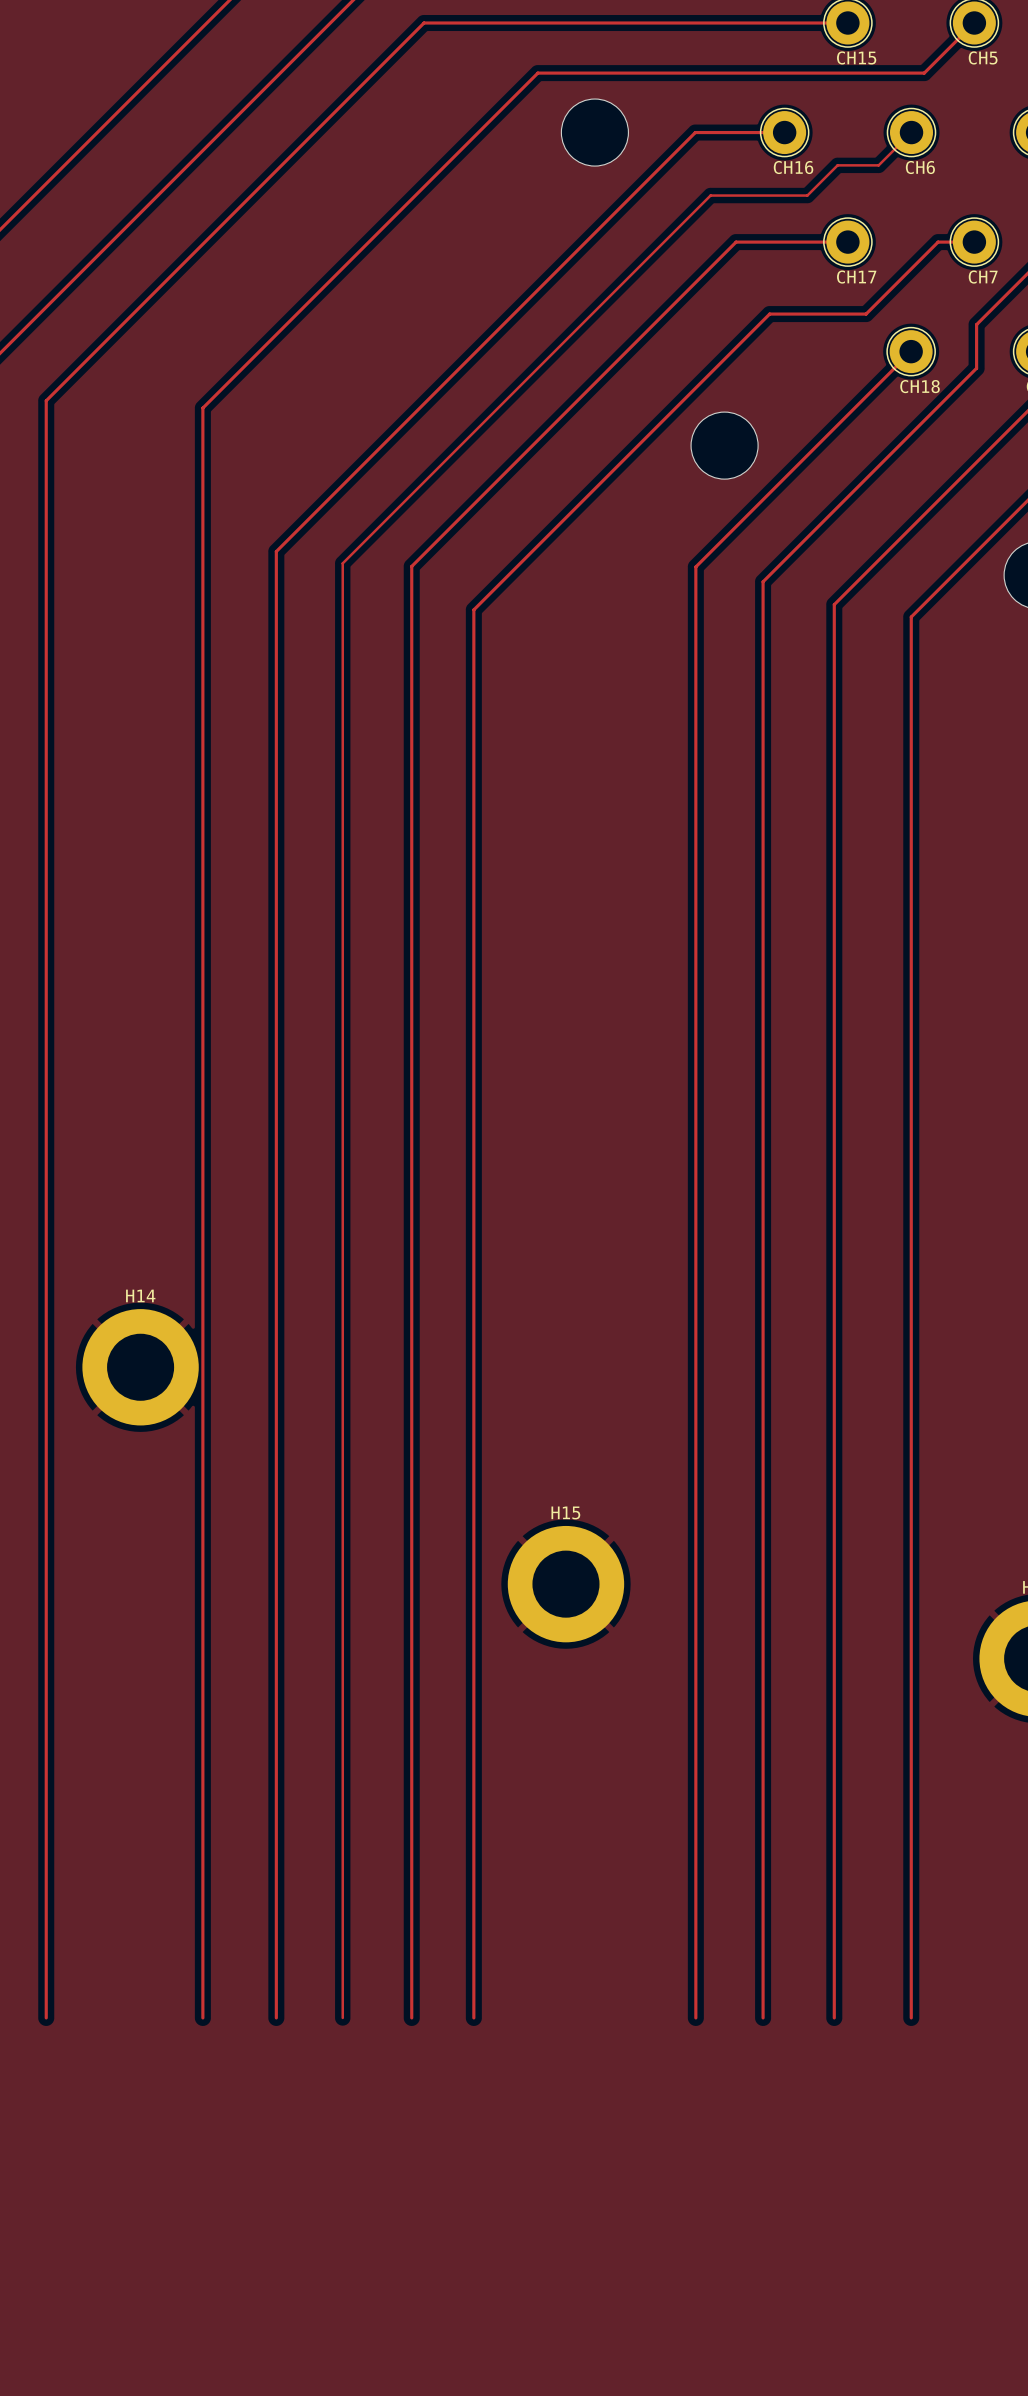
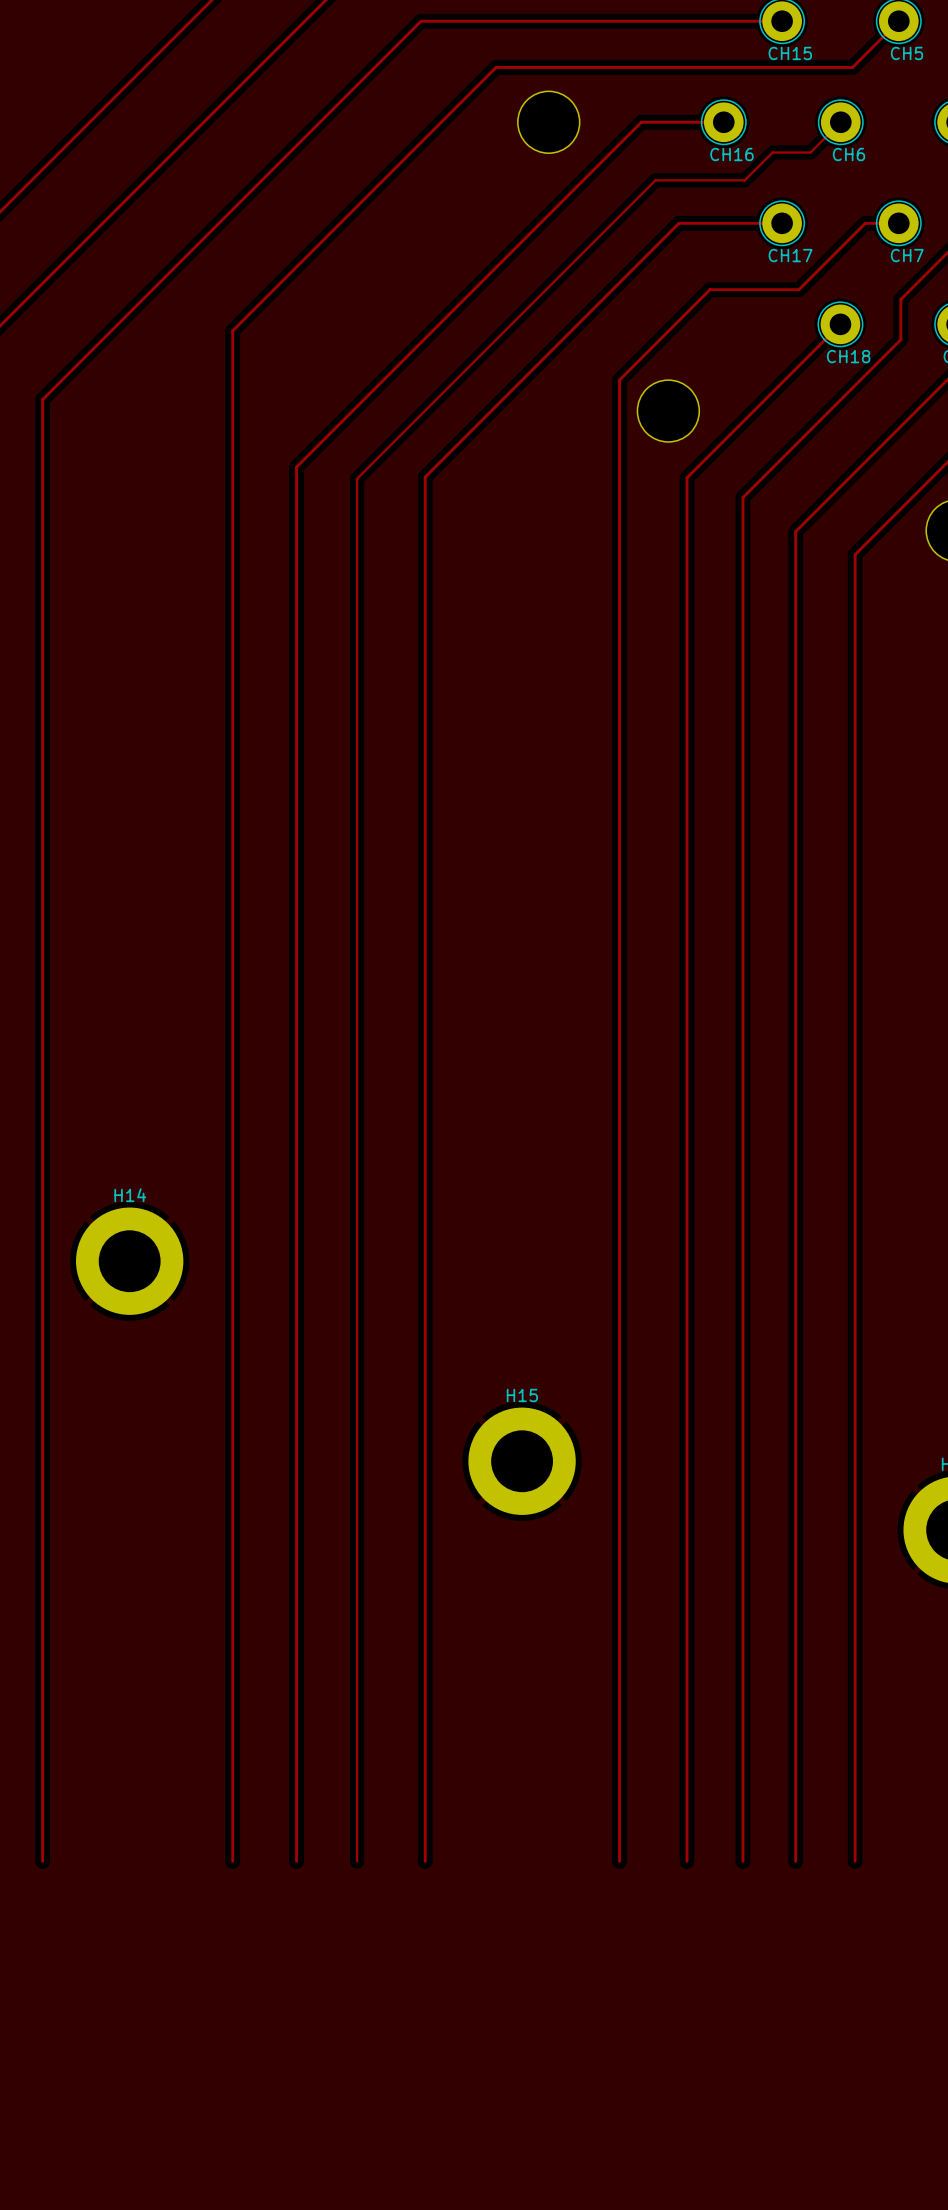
track: (456, 23) (424, 23) (46, 400) (46, 433) -> (421, 21) (42, 399)
track: (252, 358) (202, 408) (202, 2017) -> (232, 330) (232, 1861)
track: (671, 412) (473, 609) (473, 2017) -> (619, 380) (619, 1861)
track: (321, 506) (276, 551) (276, 2017) -> (296, 467) (296, 1861)
track: (461, 517) (411, 566) (411, 2017) -> (425, 477) (425, 1861)
track: (744, 517) (695, 566) (695, 2017) -> (687, 477) (687, 1861)
track: (387, 518) (342, 563) (342, 2017) -> (357, 478) (357, 1861)
track: (805, 539) (763, 581) (763, 2017) -> (742, 497) (742, 1861)
track: (862, 576) (834, 604) (834, 2017) -> (795, 531) (795, 1861)
track: (927, 601) (911, 617) (911, 2017) -> (855, 554) (855, 1861)

